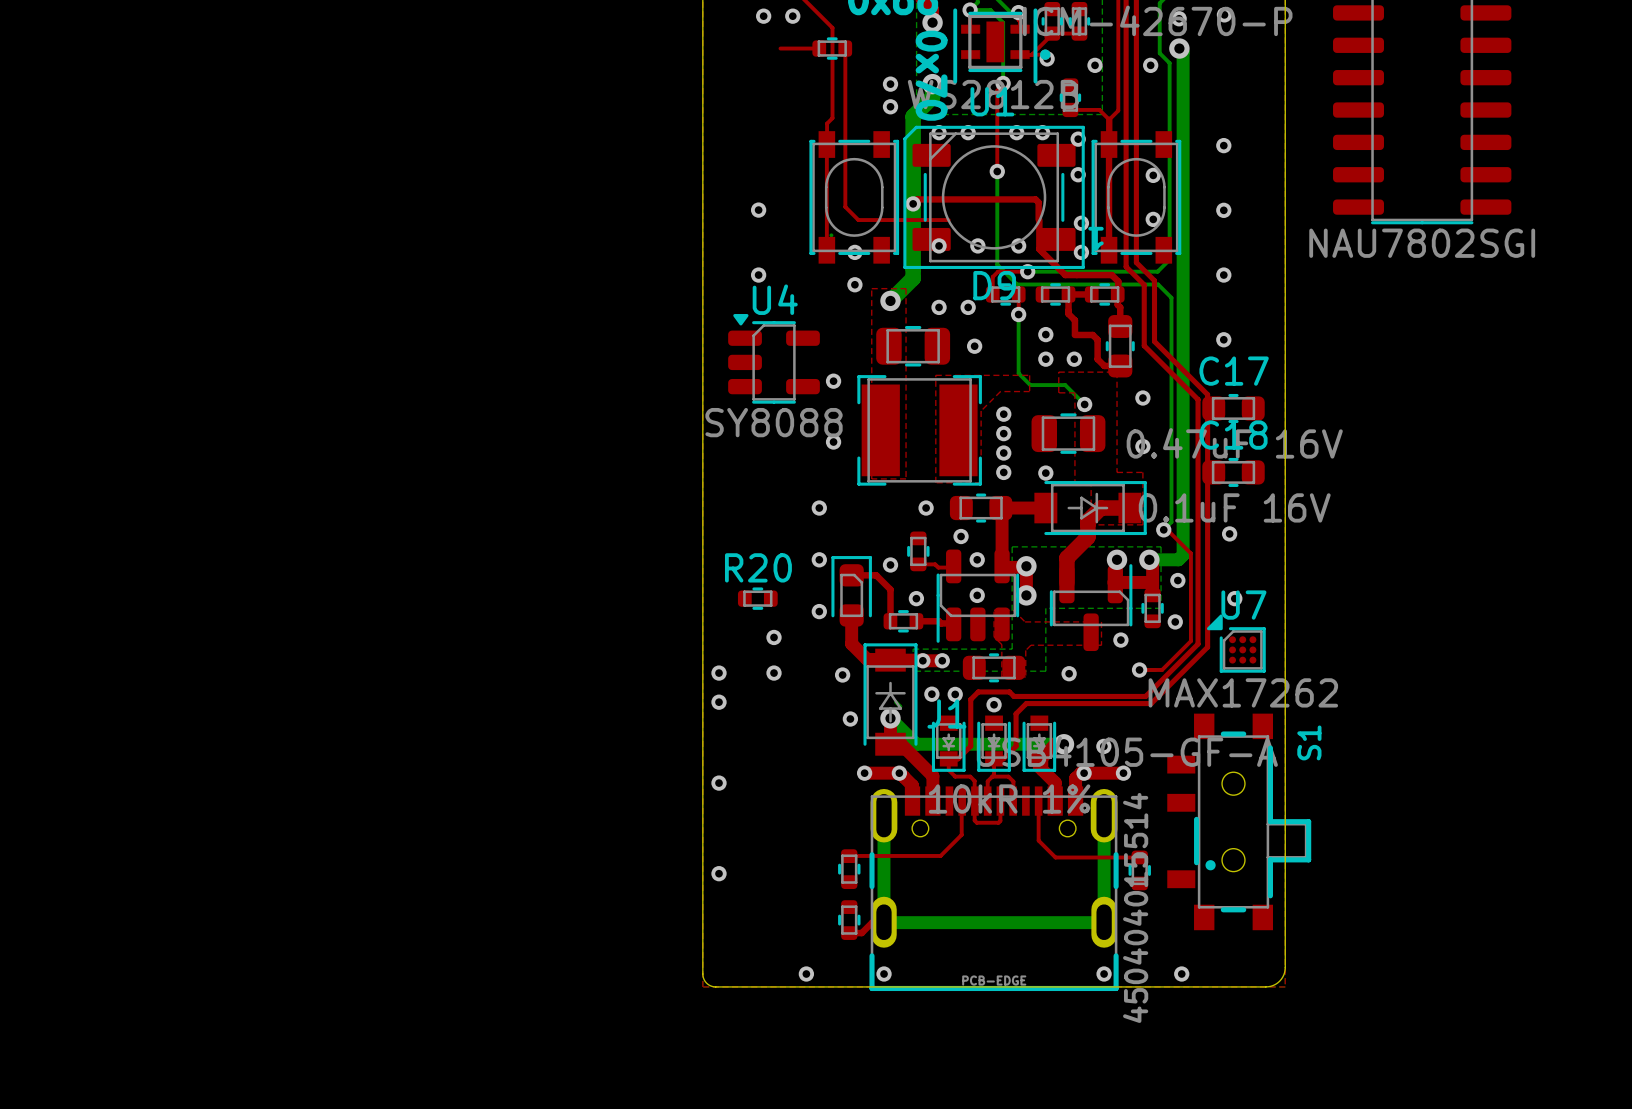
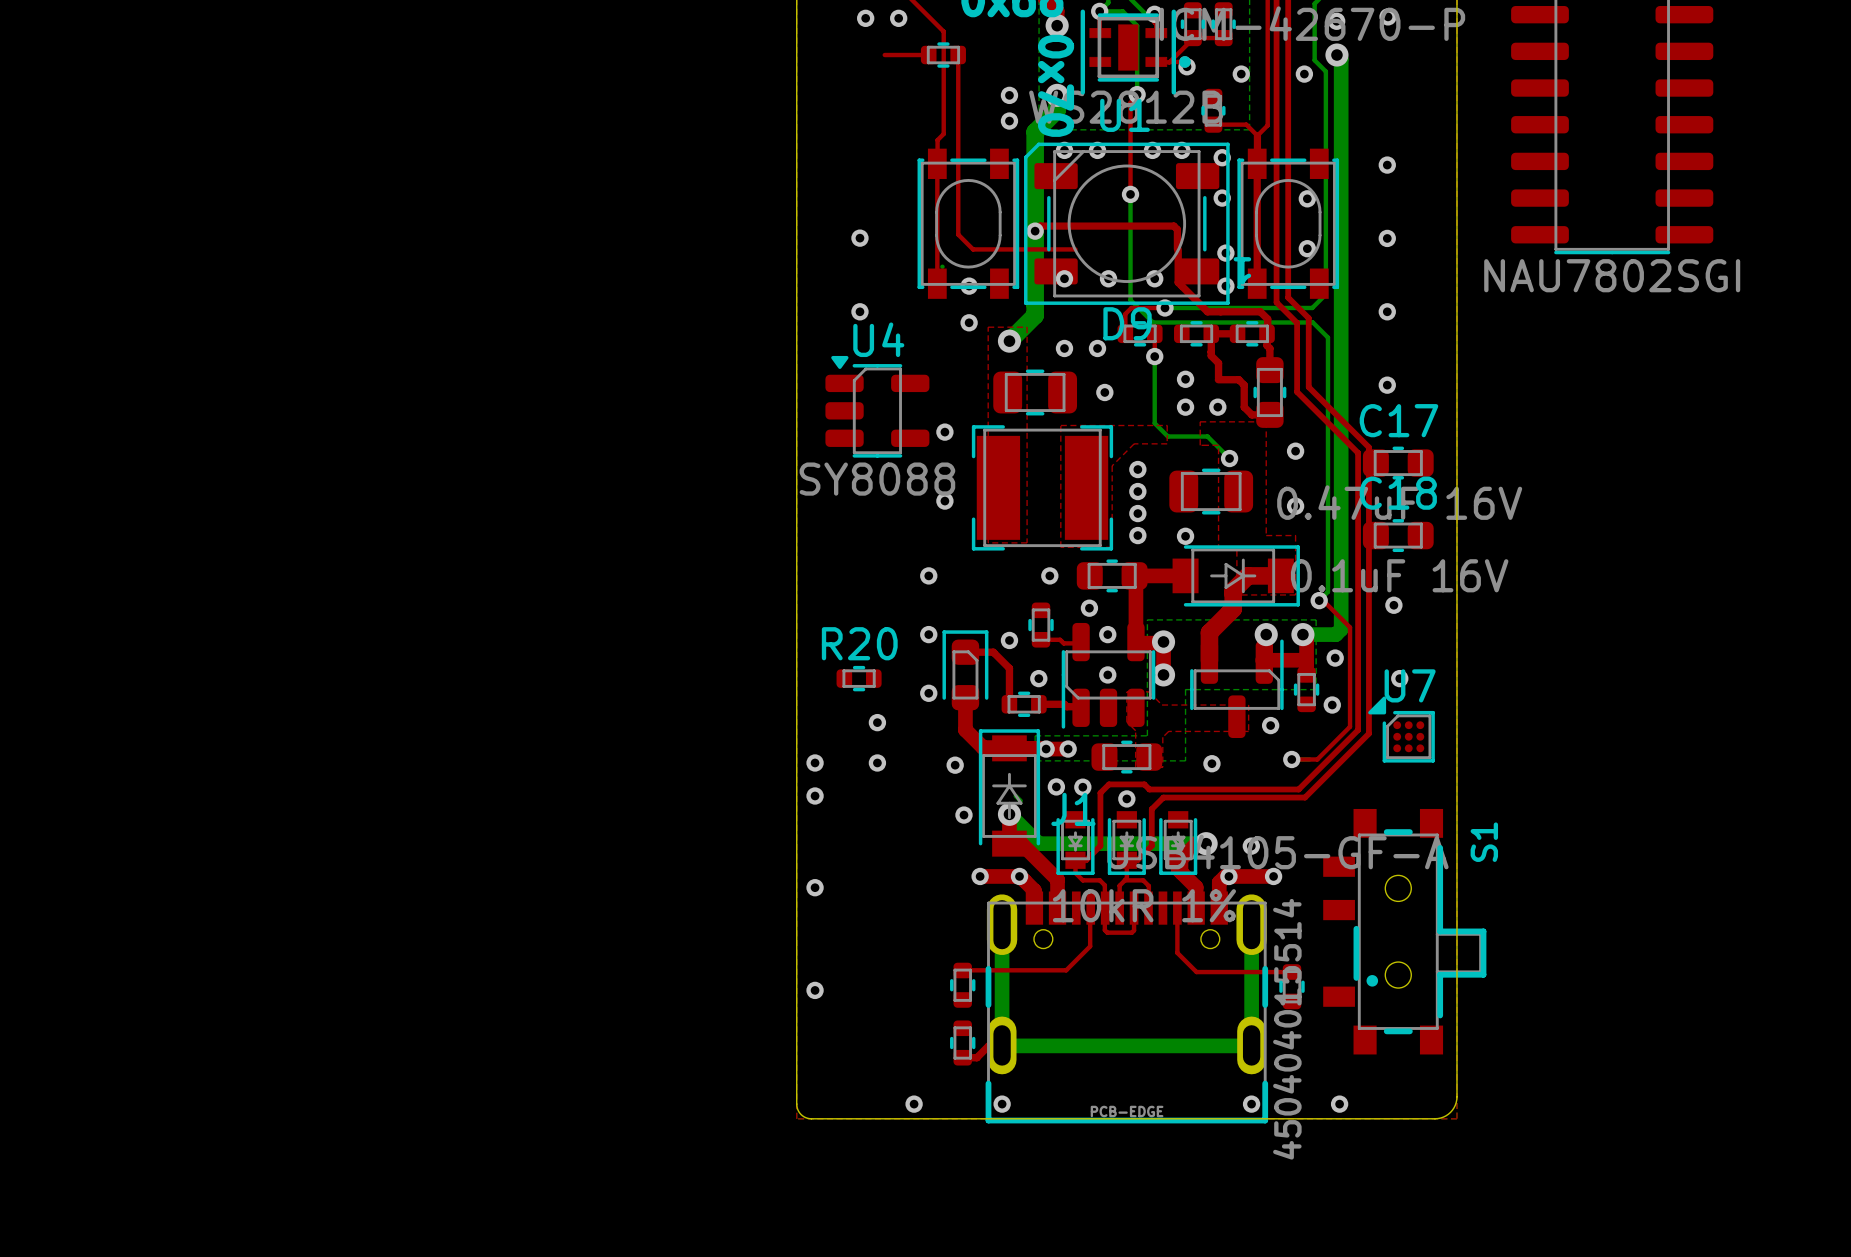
U7 value: MAX17262 (1243, 692) -> none

